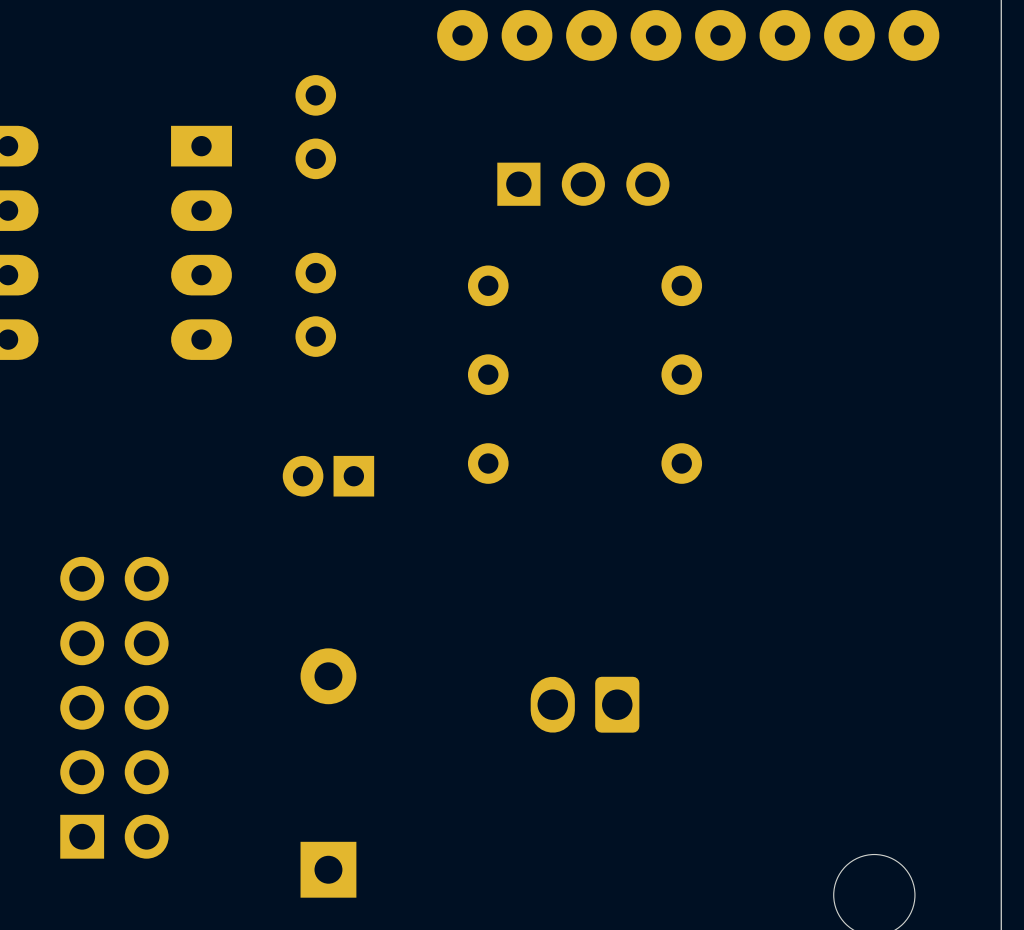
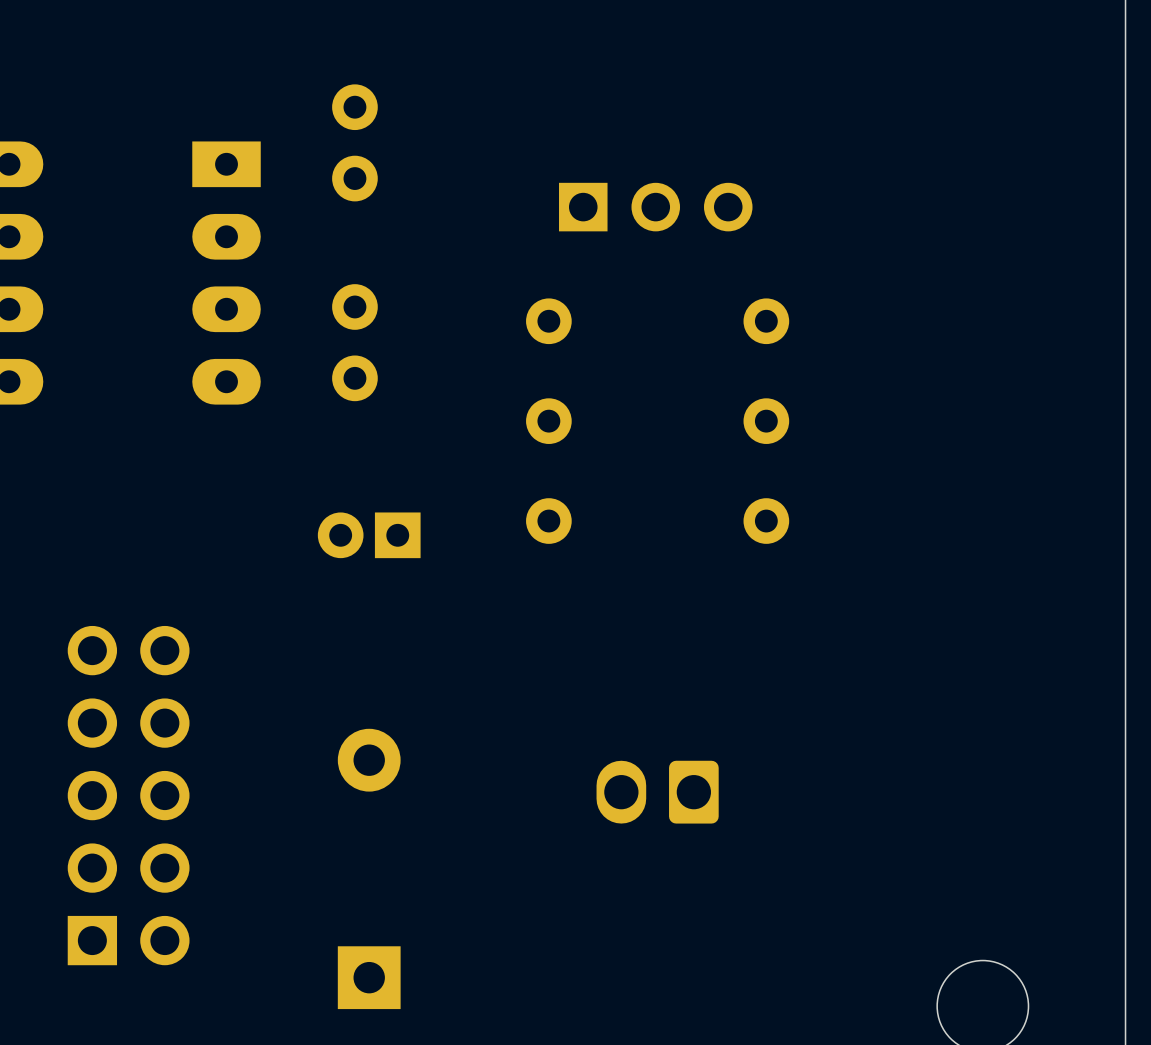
part: (462, 35) -> none
part: (527, 35) -> none
part: (591, 35) -> none
part: (655, 35) -> none
part: (720, 35) -> none
part: (784, 35) -> none
part: (849, 35) -> none
part: (913, 35) -> none

